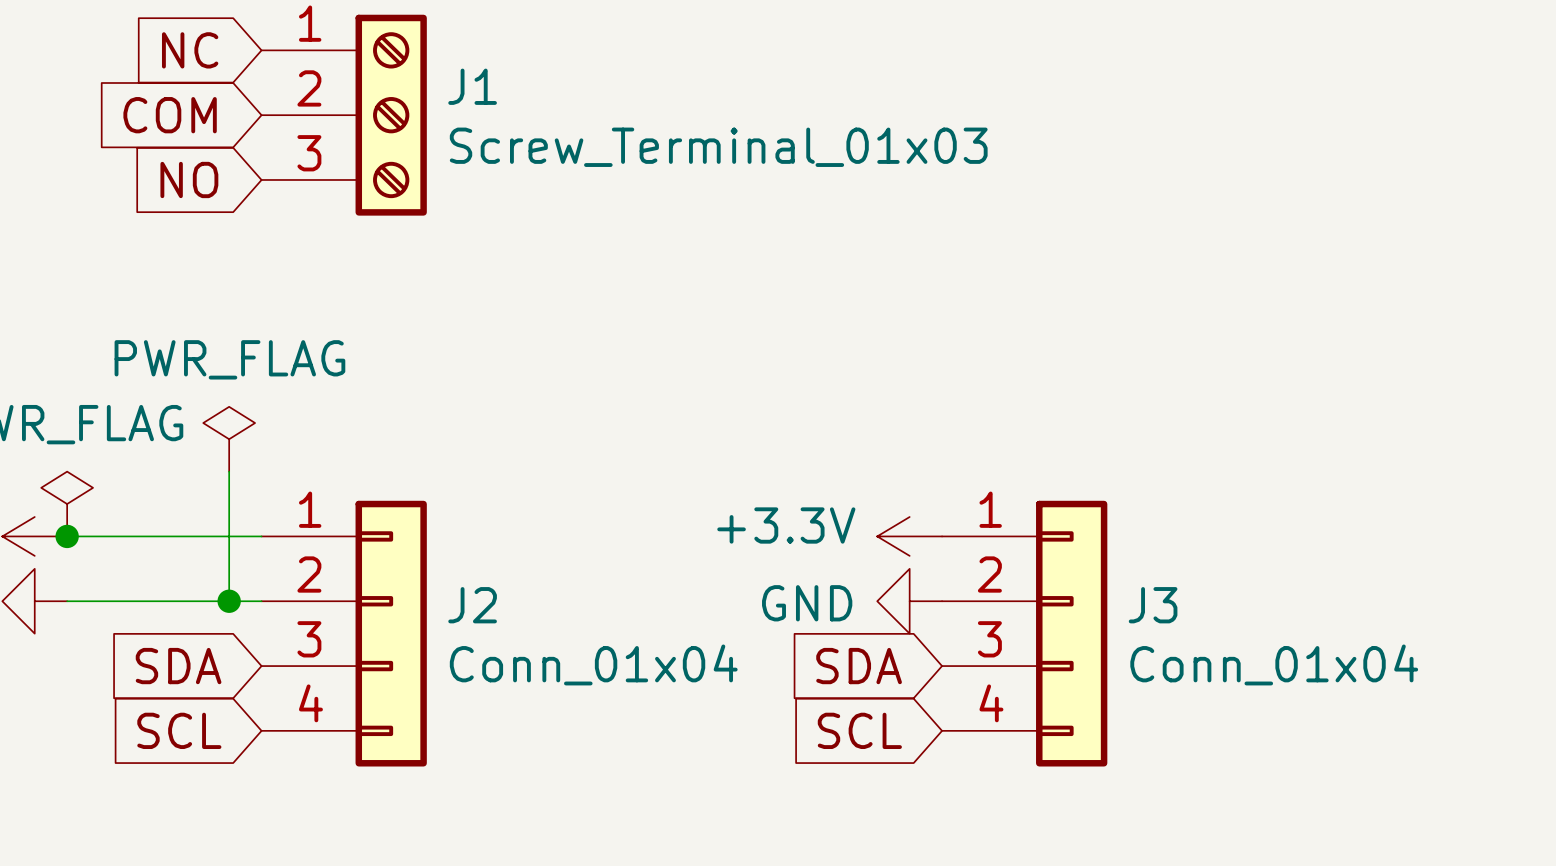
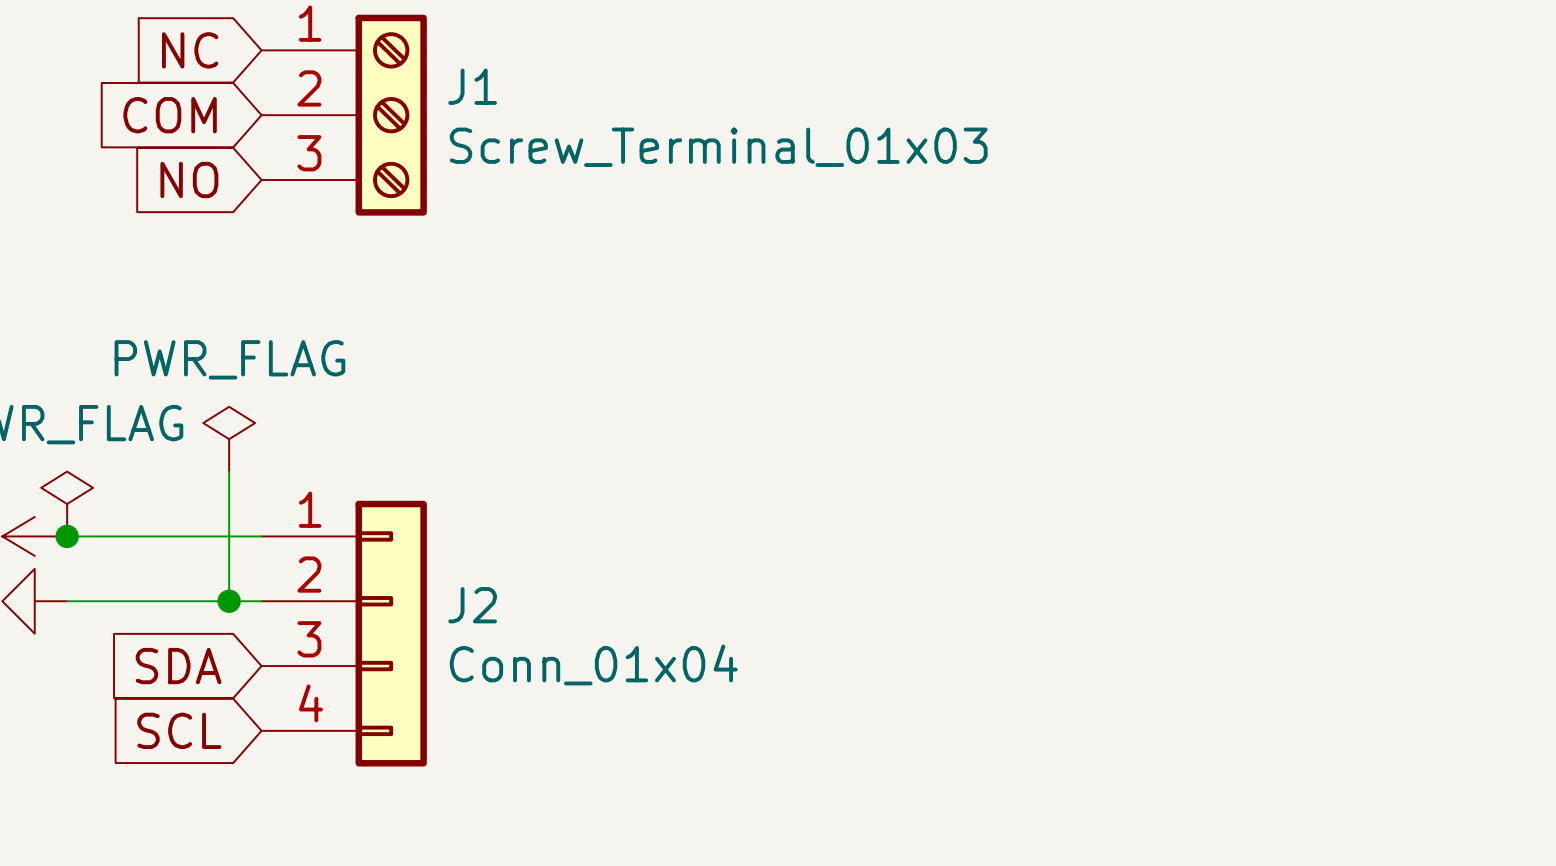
power symbol: +3.3V (909, 536) -> none
power symbol: GND (909, 601) -> none
J3: Conn_01x04 (1024, 633) -> none
global label: SDA (859, 666) -> none
global label: SCL (859, 730) -> none

